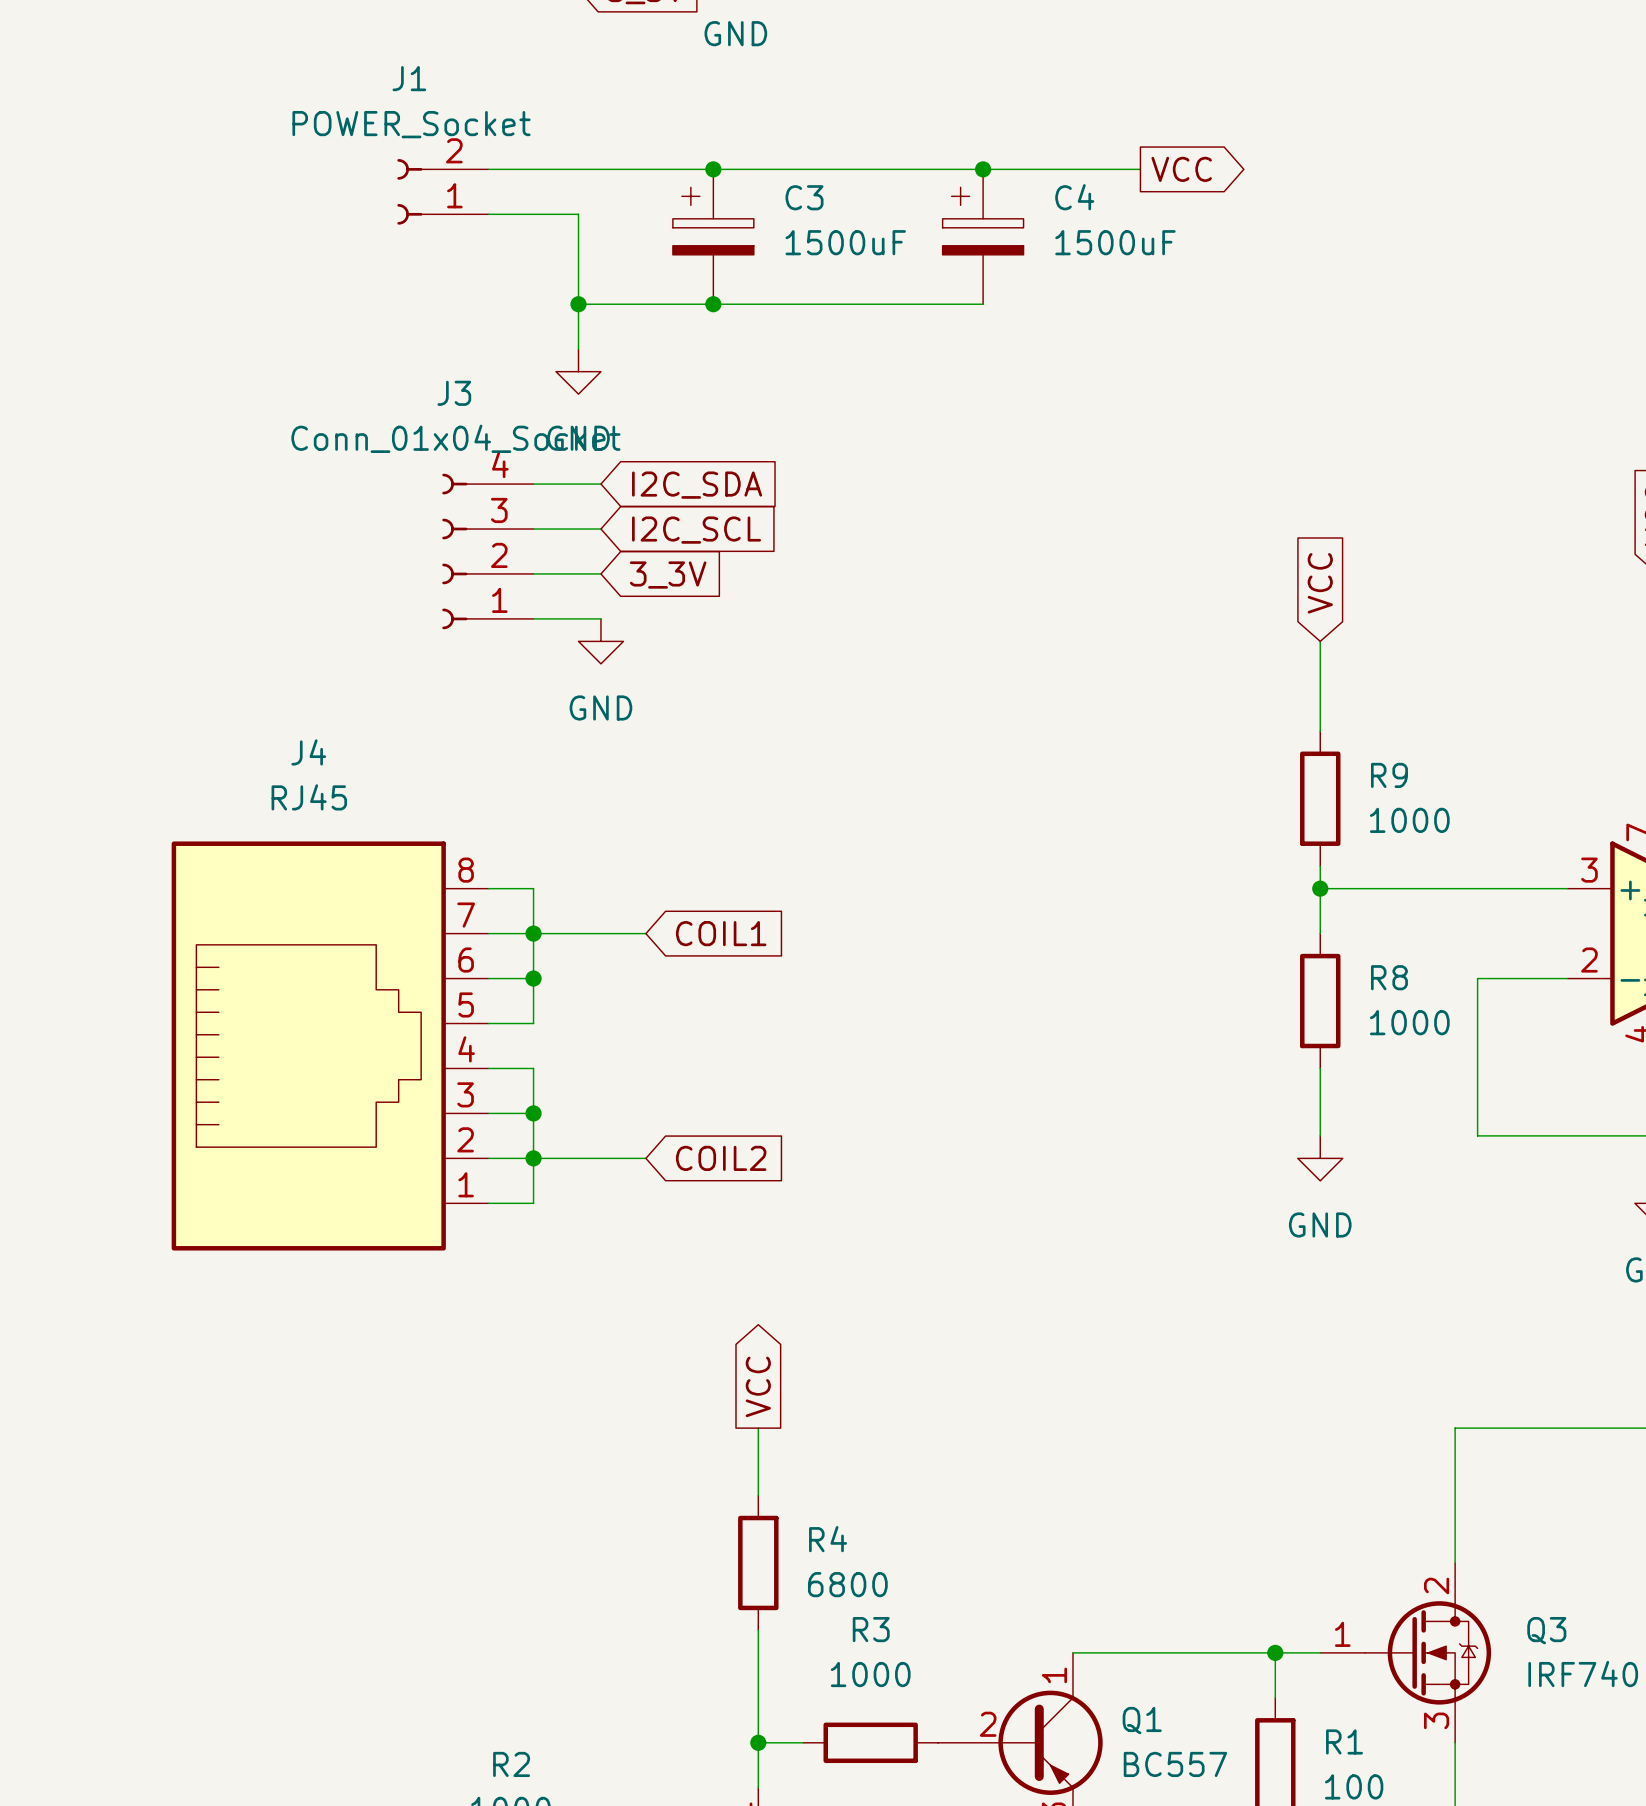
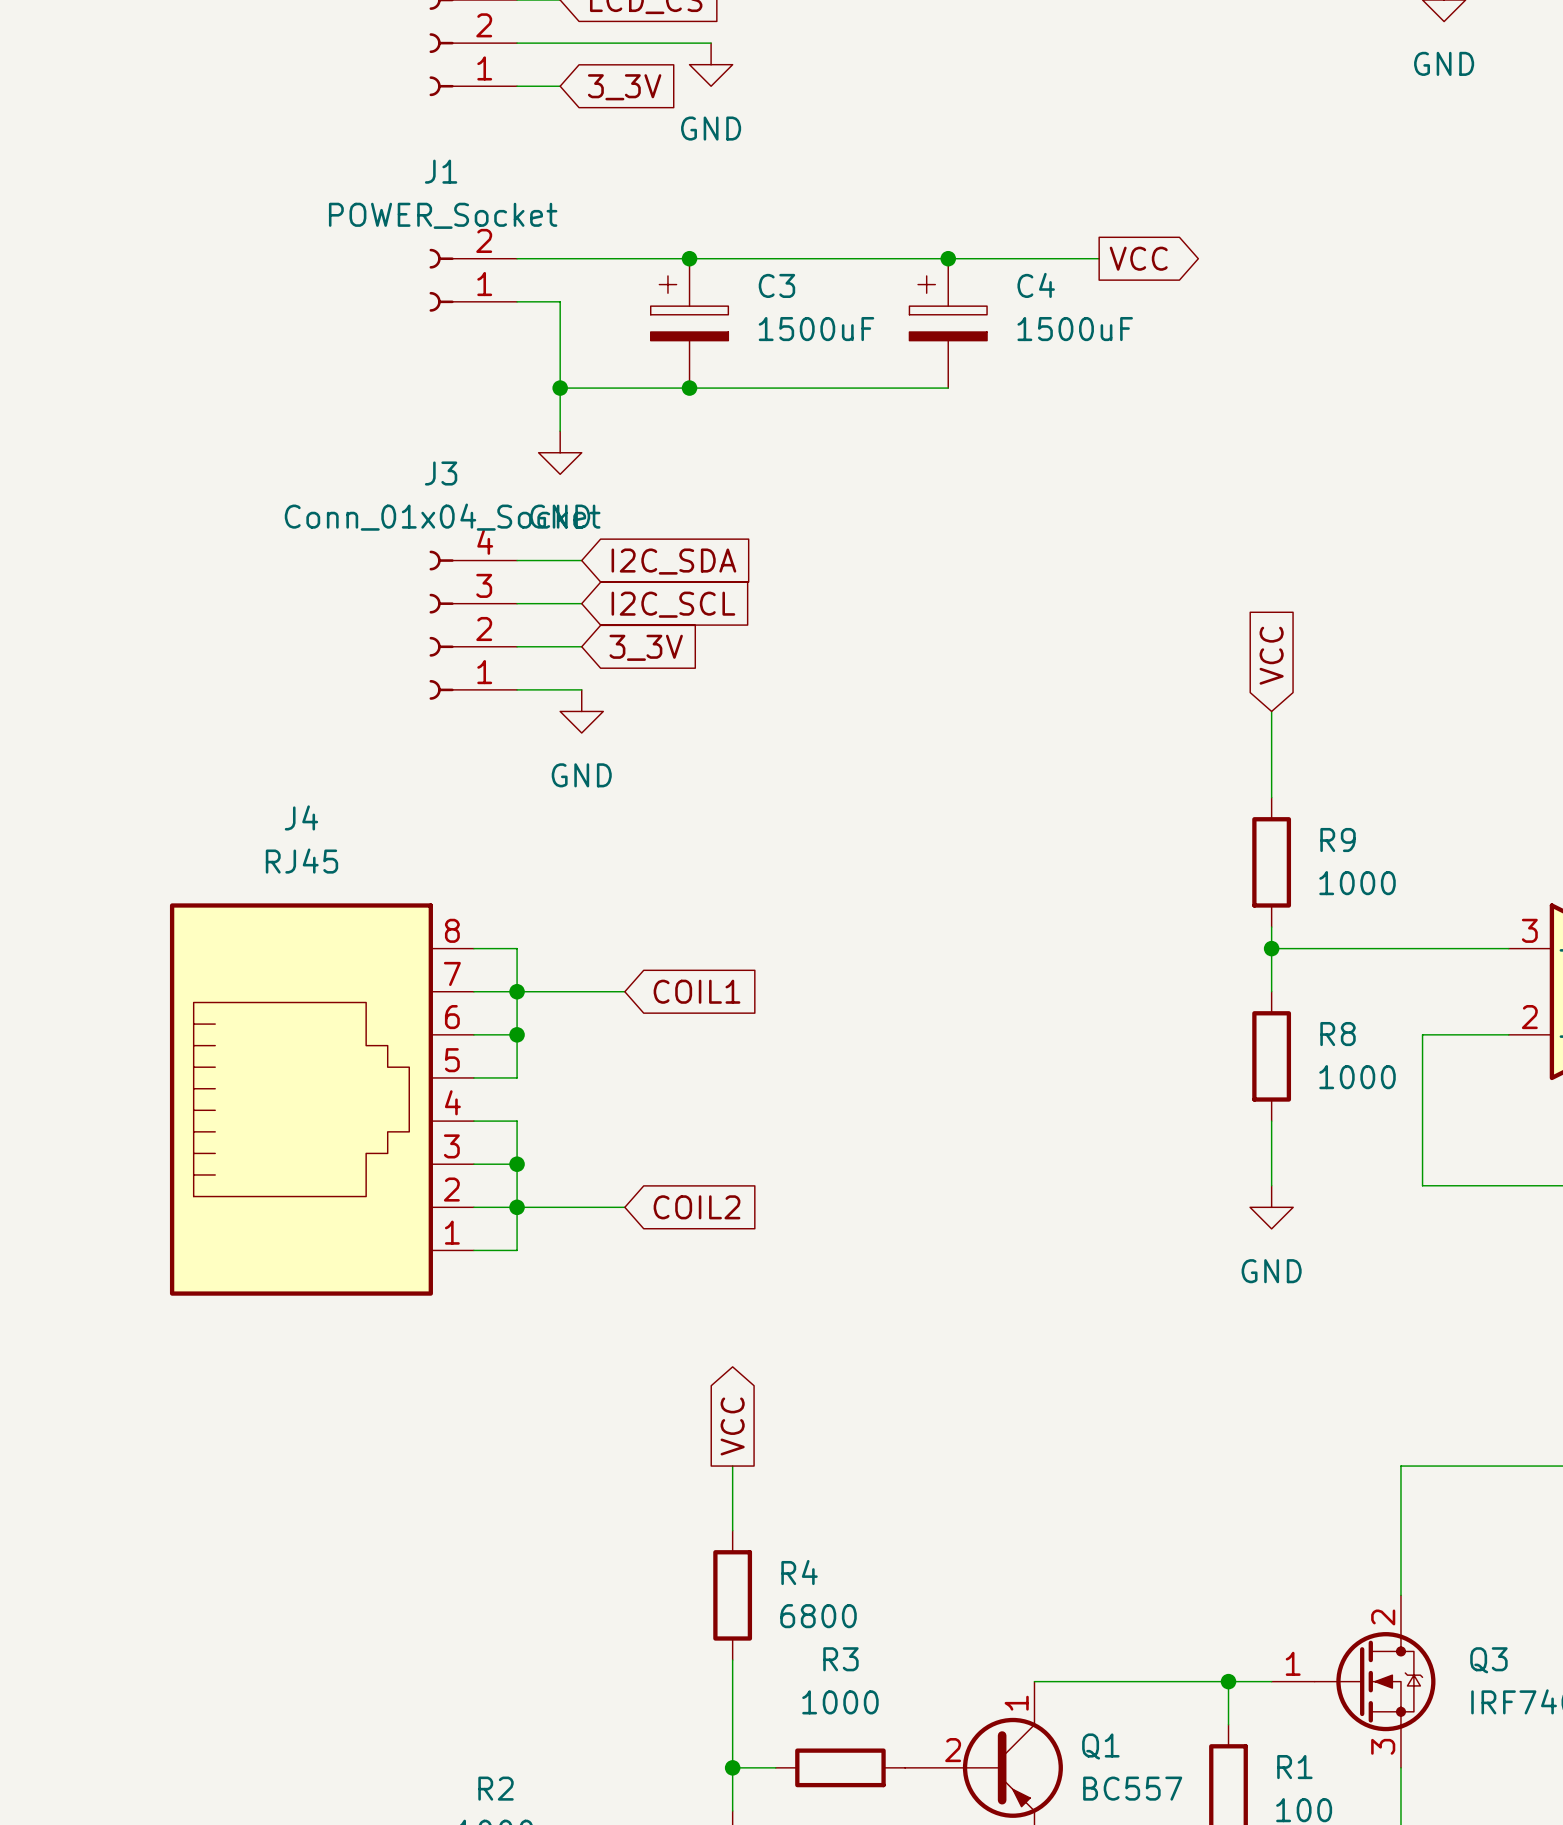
J1 position: (442, 191) -> (473, 280)

